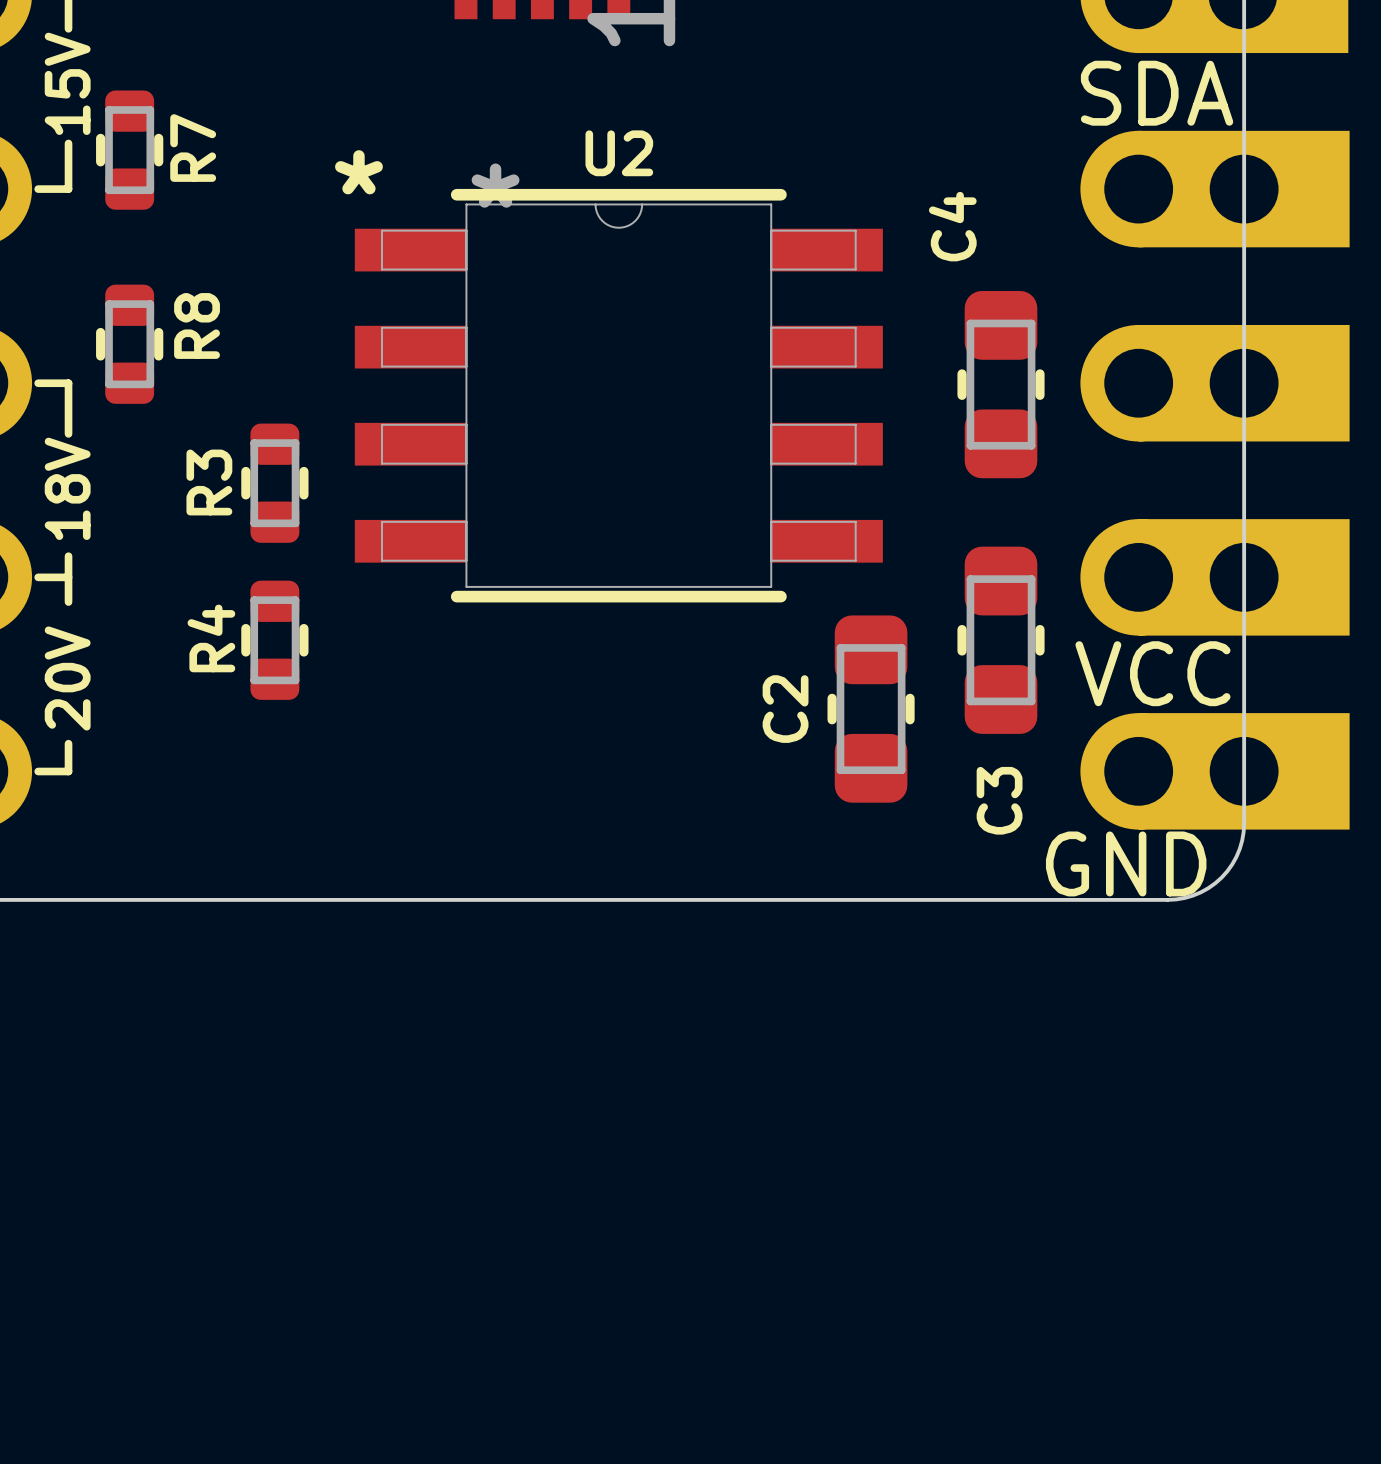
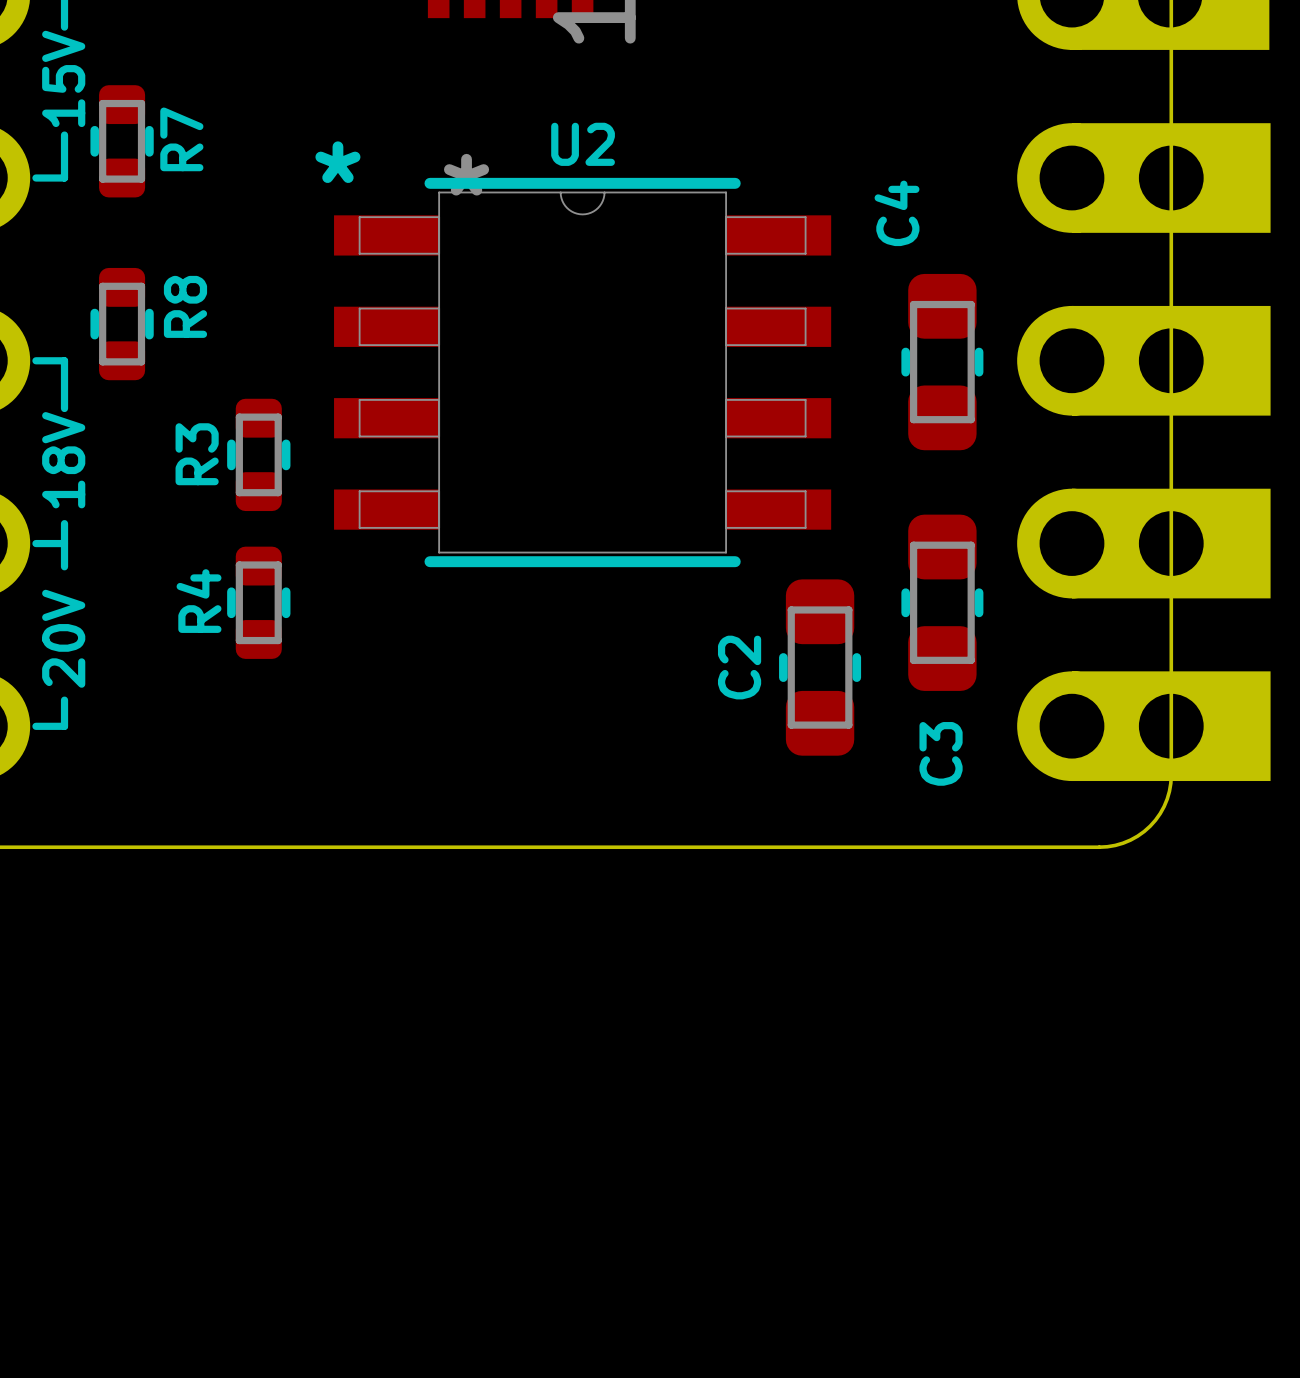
text: SDA (1157, 93) -> none
text: VCC (1152, 673) -> none
text: GND (1126, 863) -> none

